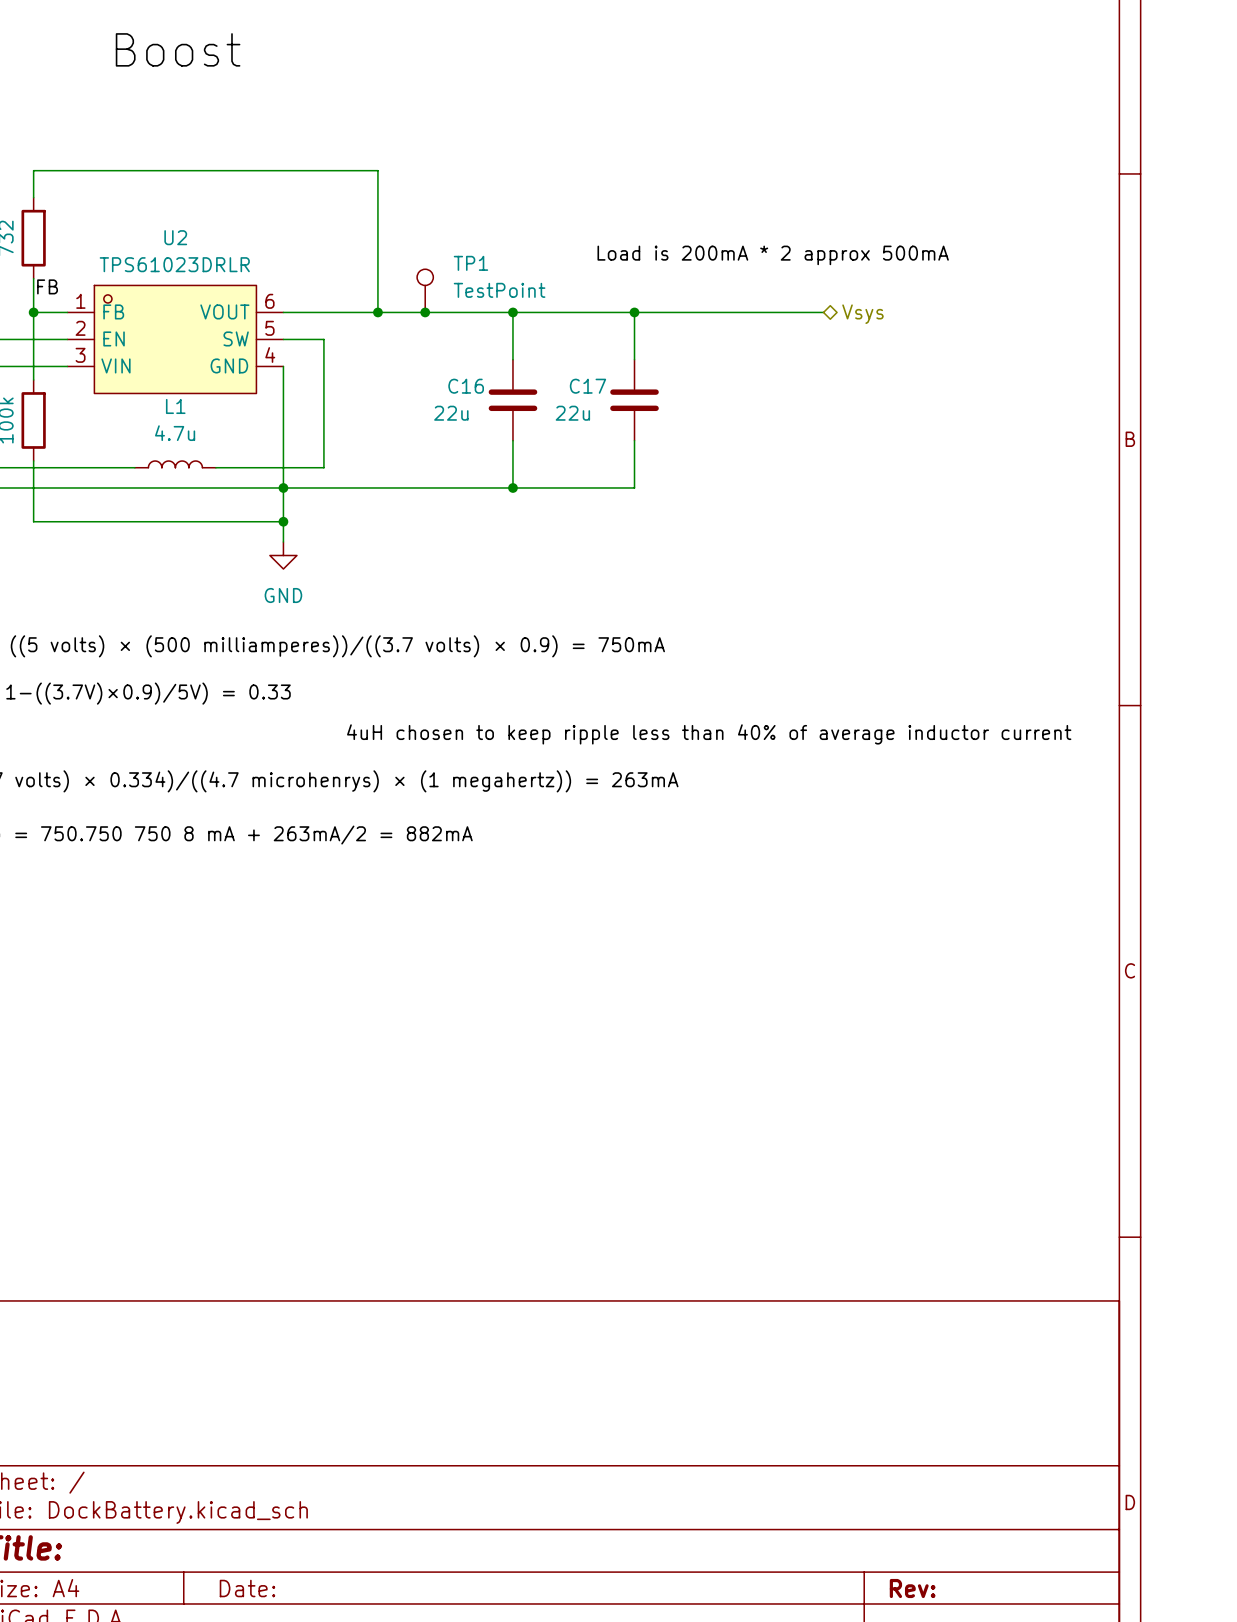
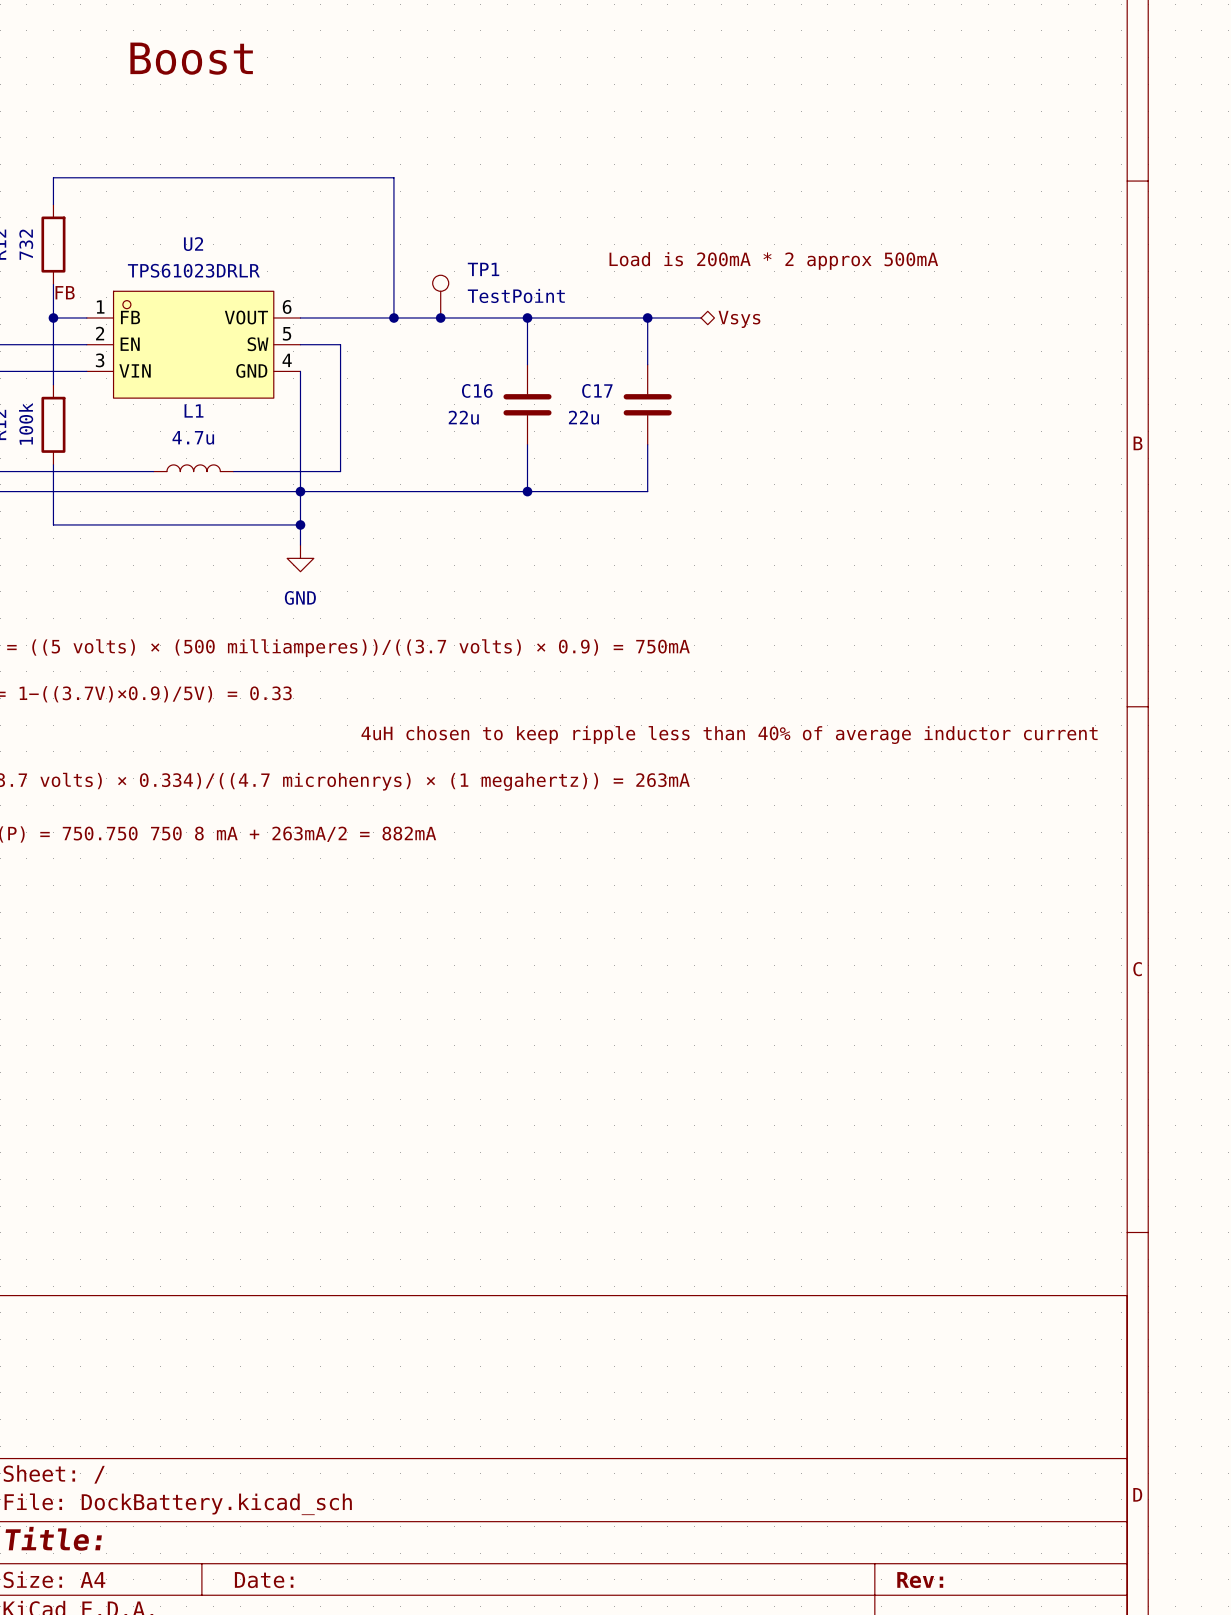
wire: (688, 312) (823, 312) -> none
hierarchical label position: Vsys (862, 314) -> Vsys (739, 319)

